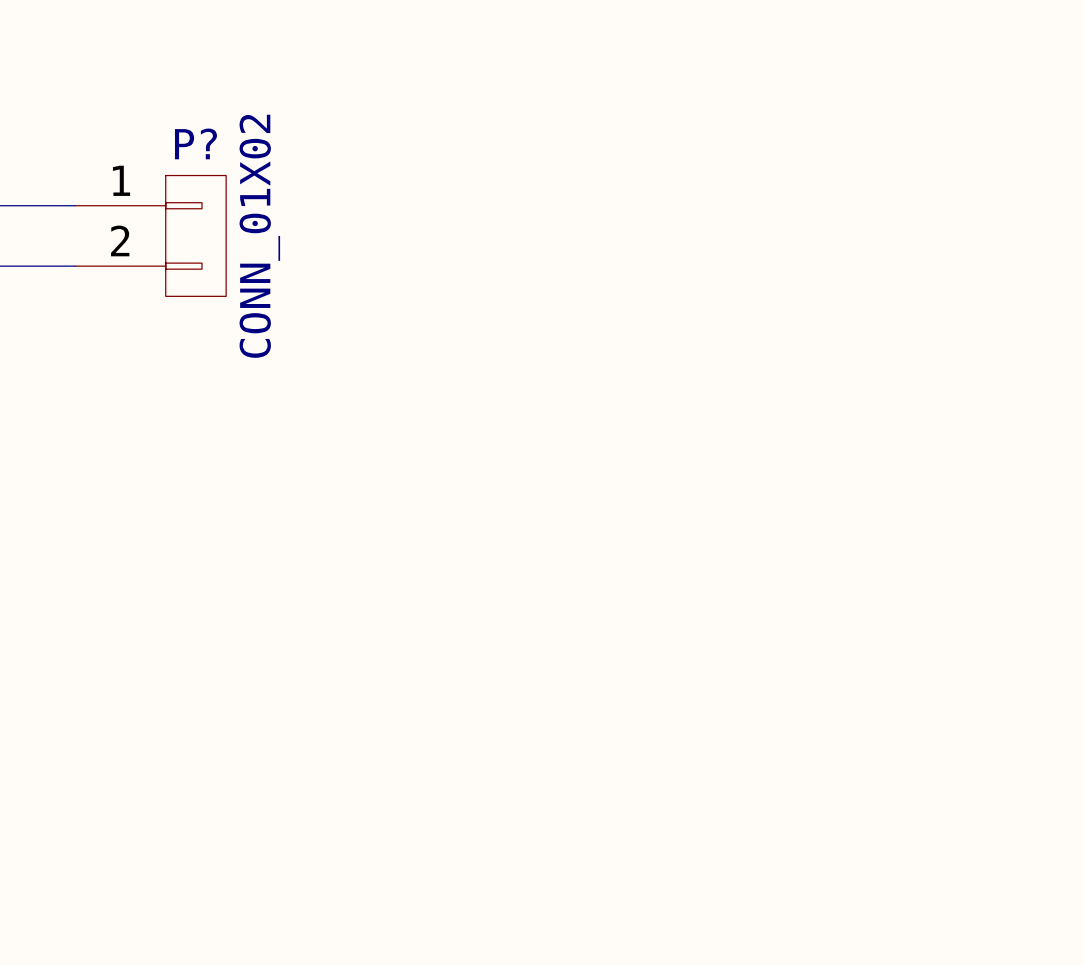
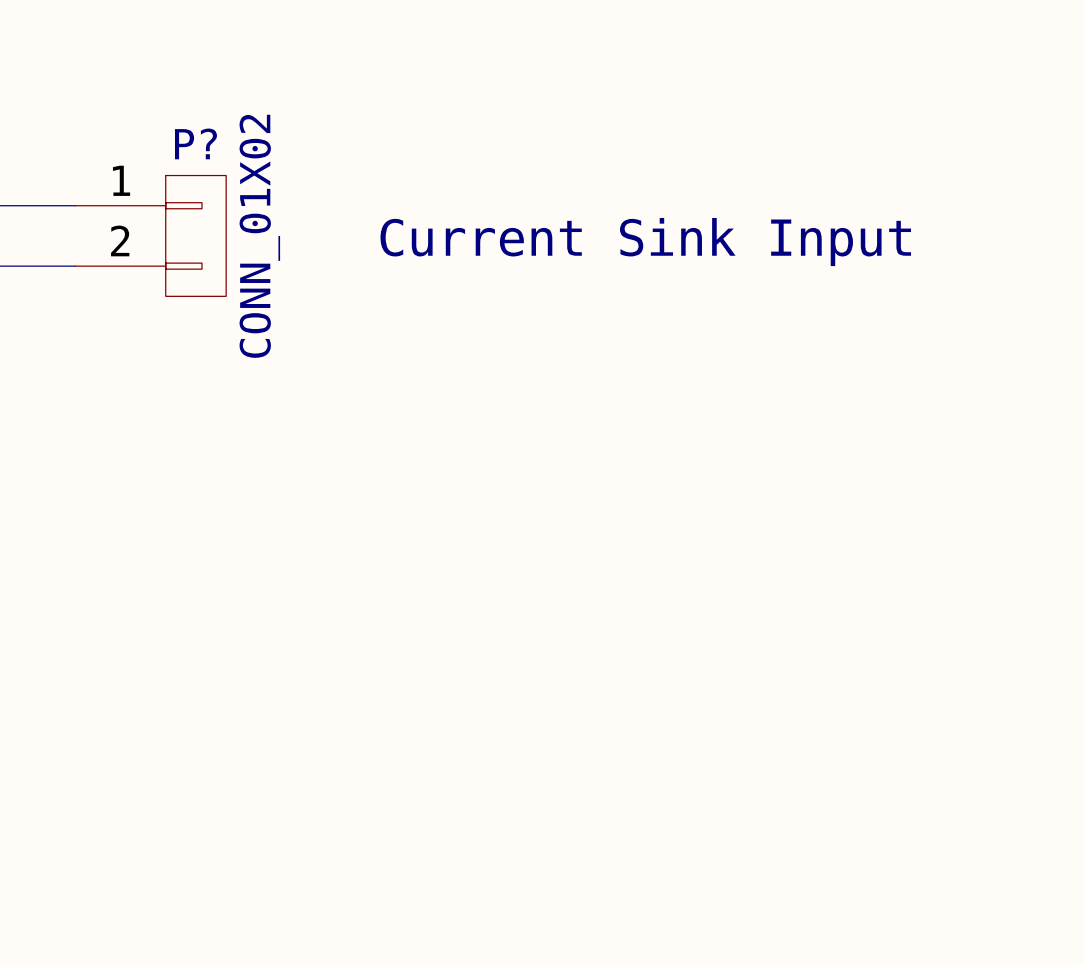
text: none -> Current Sink Input (645, 242)

